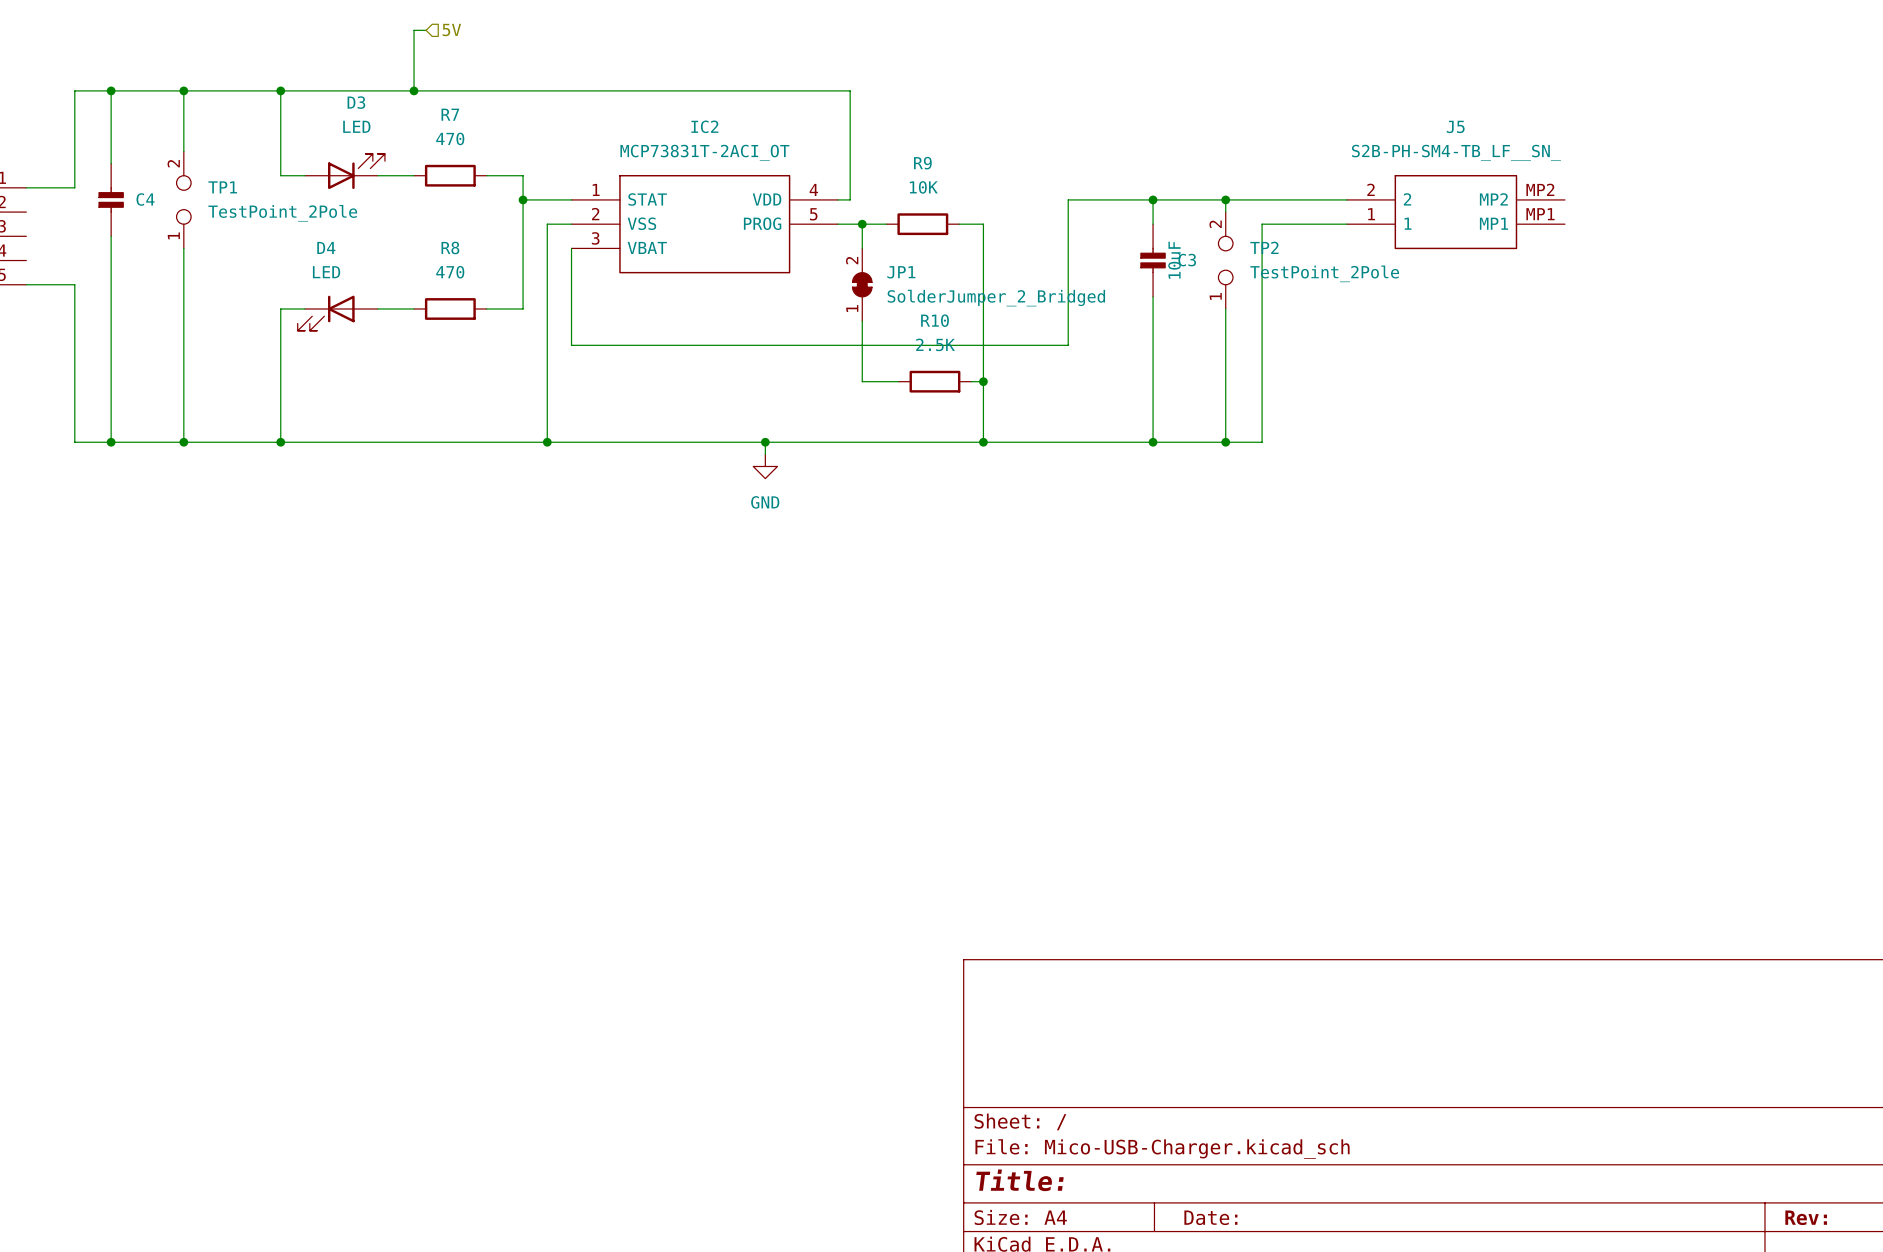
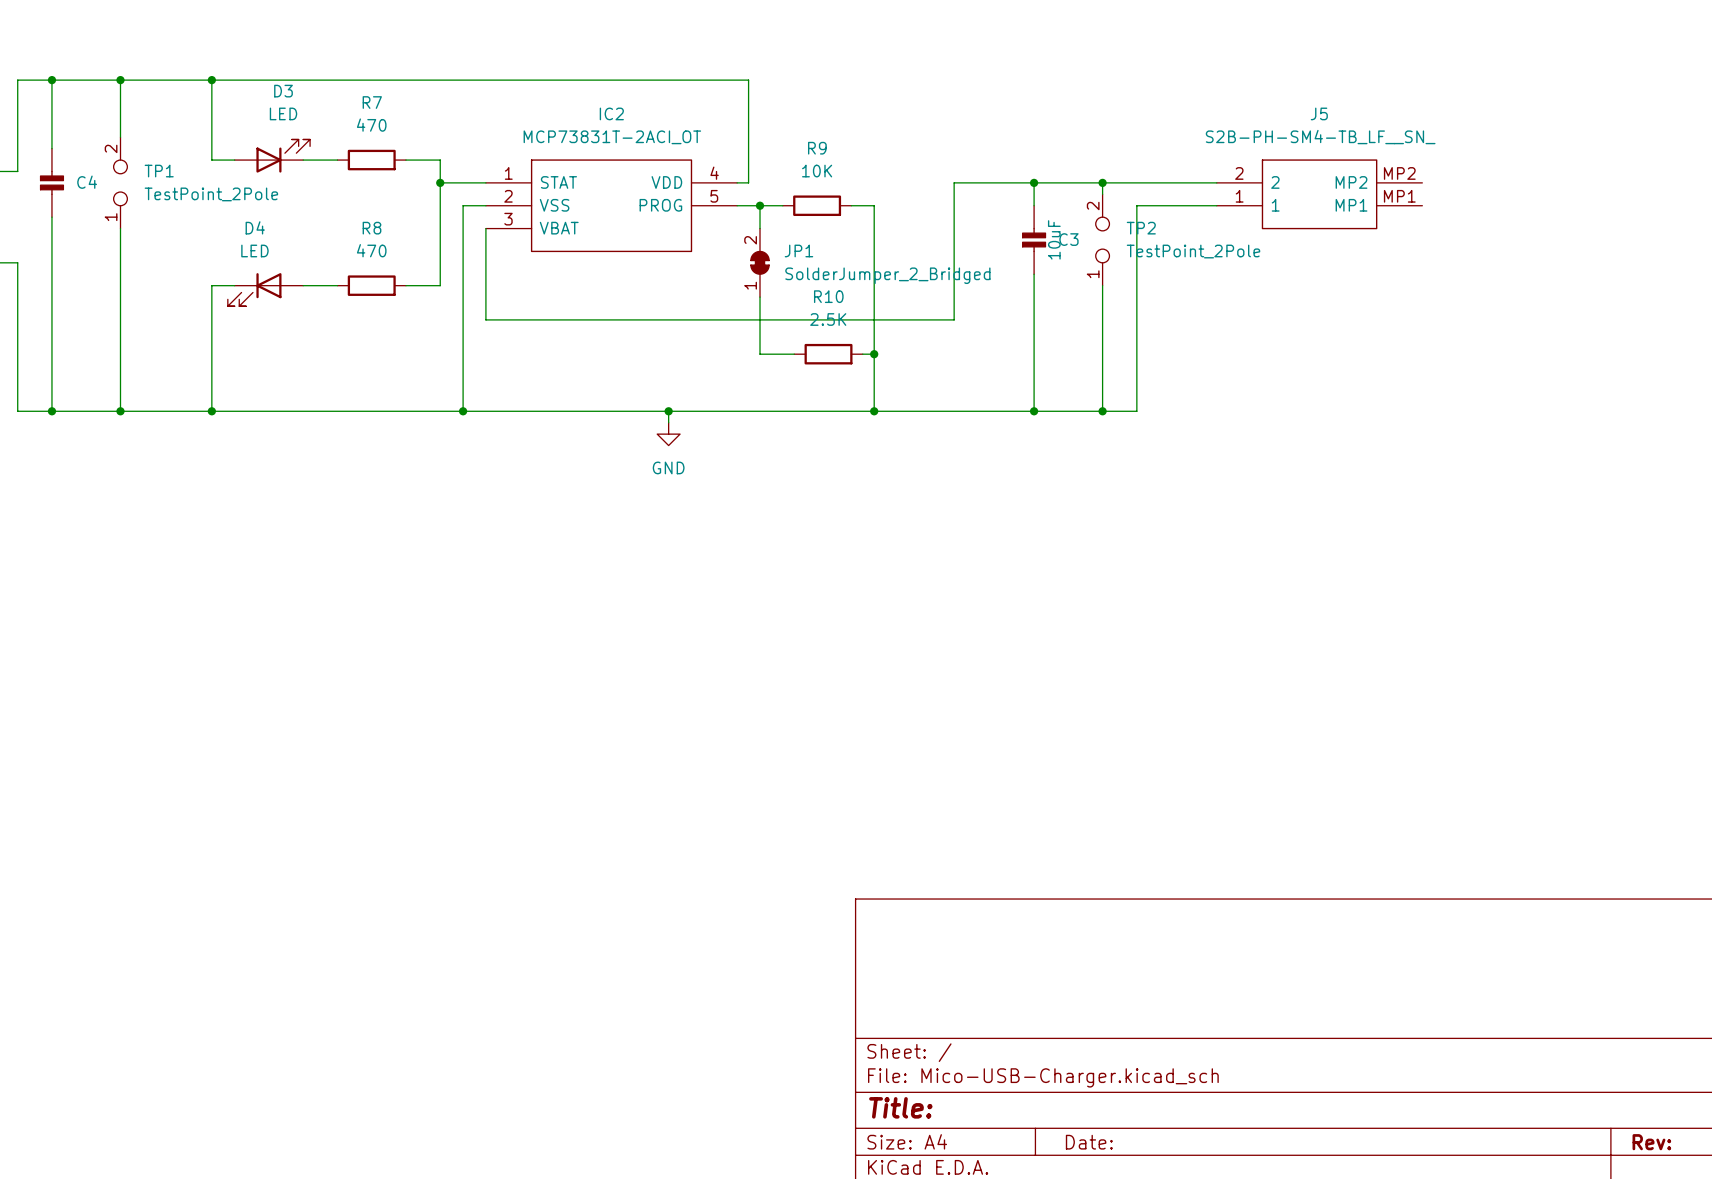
wire: (426, 30) (414, 30) (414, 90) -> none
hierarchical label: 5V (451, 30) -> none
junction: (414, 90) -> none

